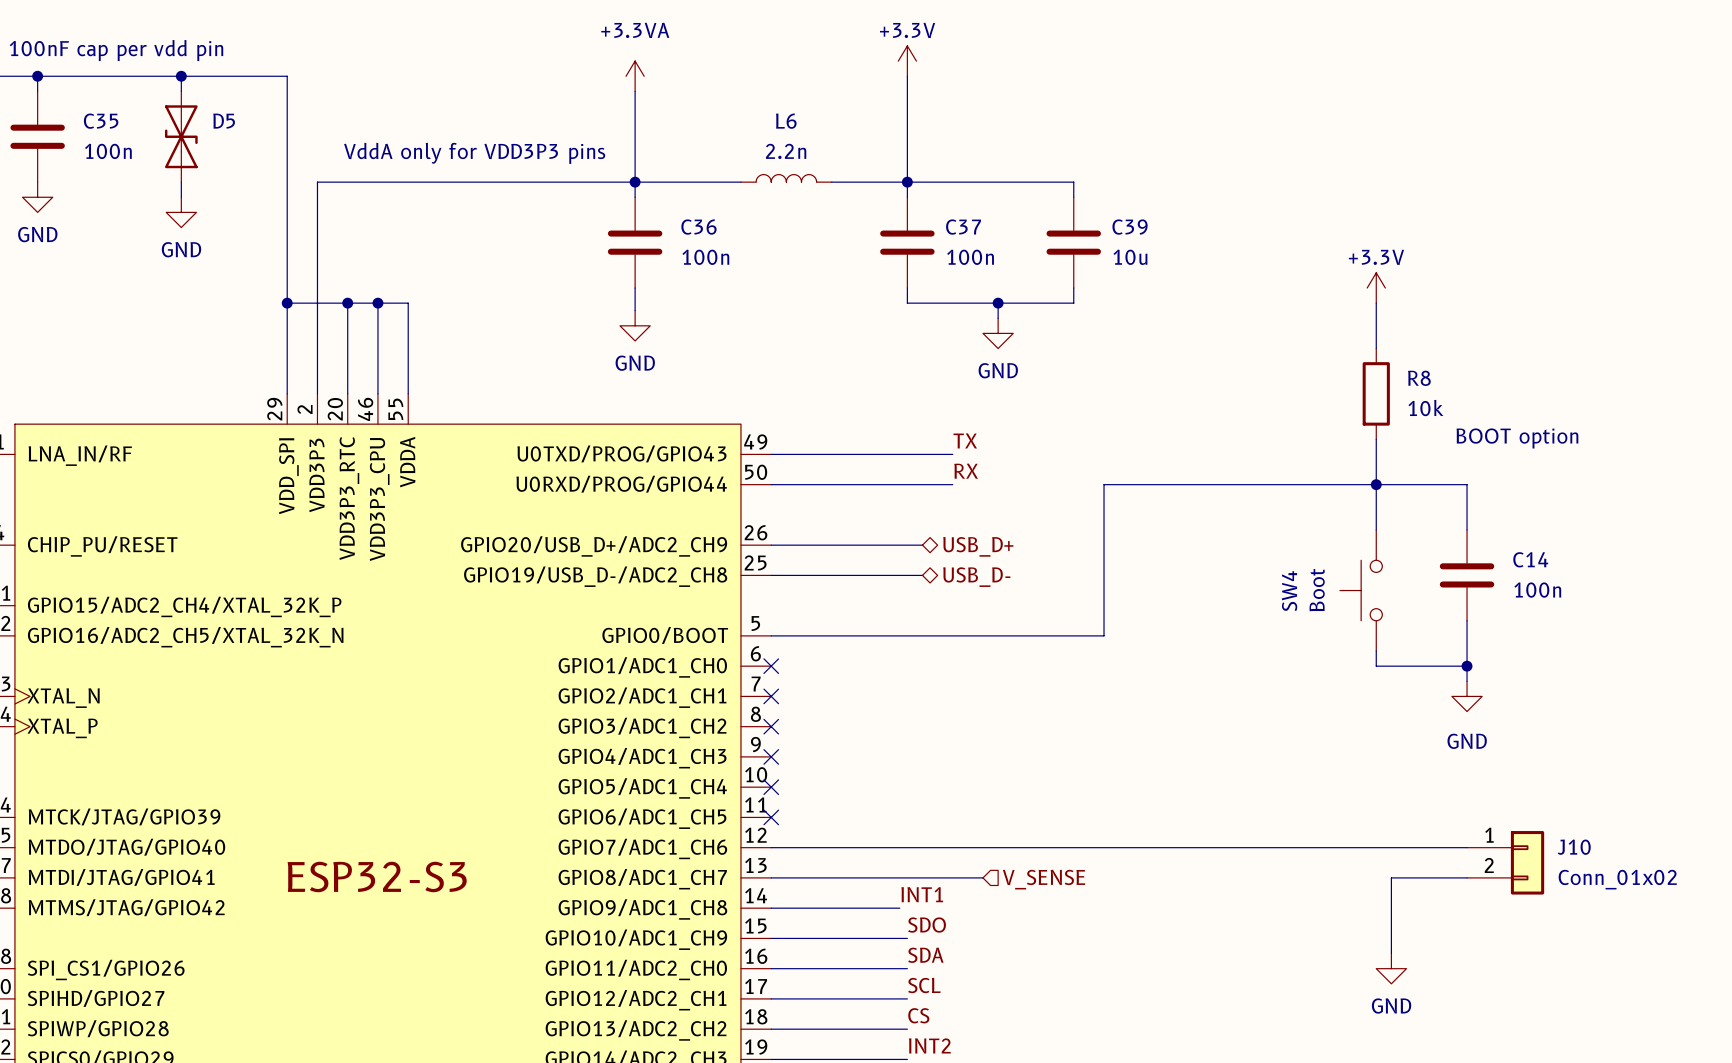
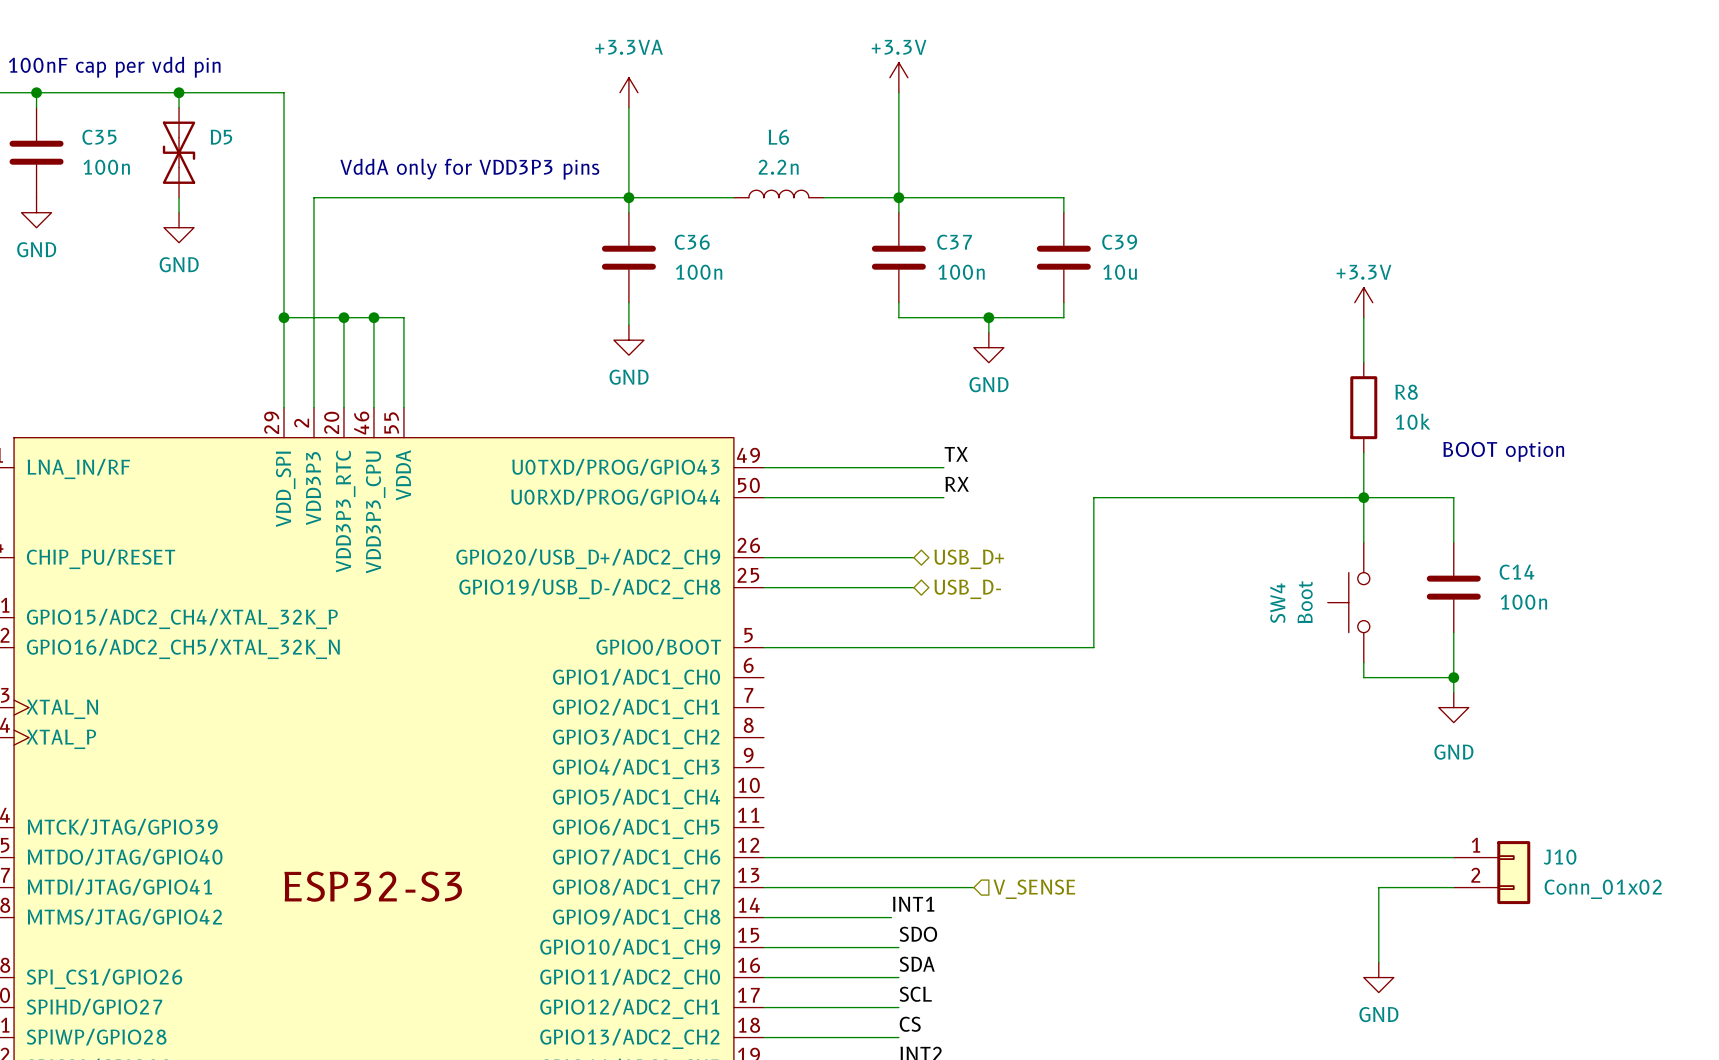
no-connect mark: (771, 666) -> none
no-connect mark: (771, 696) -> none
no-connect mark: (771, 726) -> none
no-connect mark: (771, 756) -> none
no-connect mark: (771, 787) -> none
no-connect mark: (771, 817) -> none

